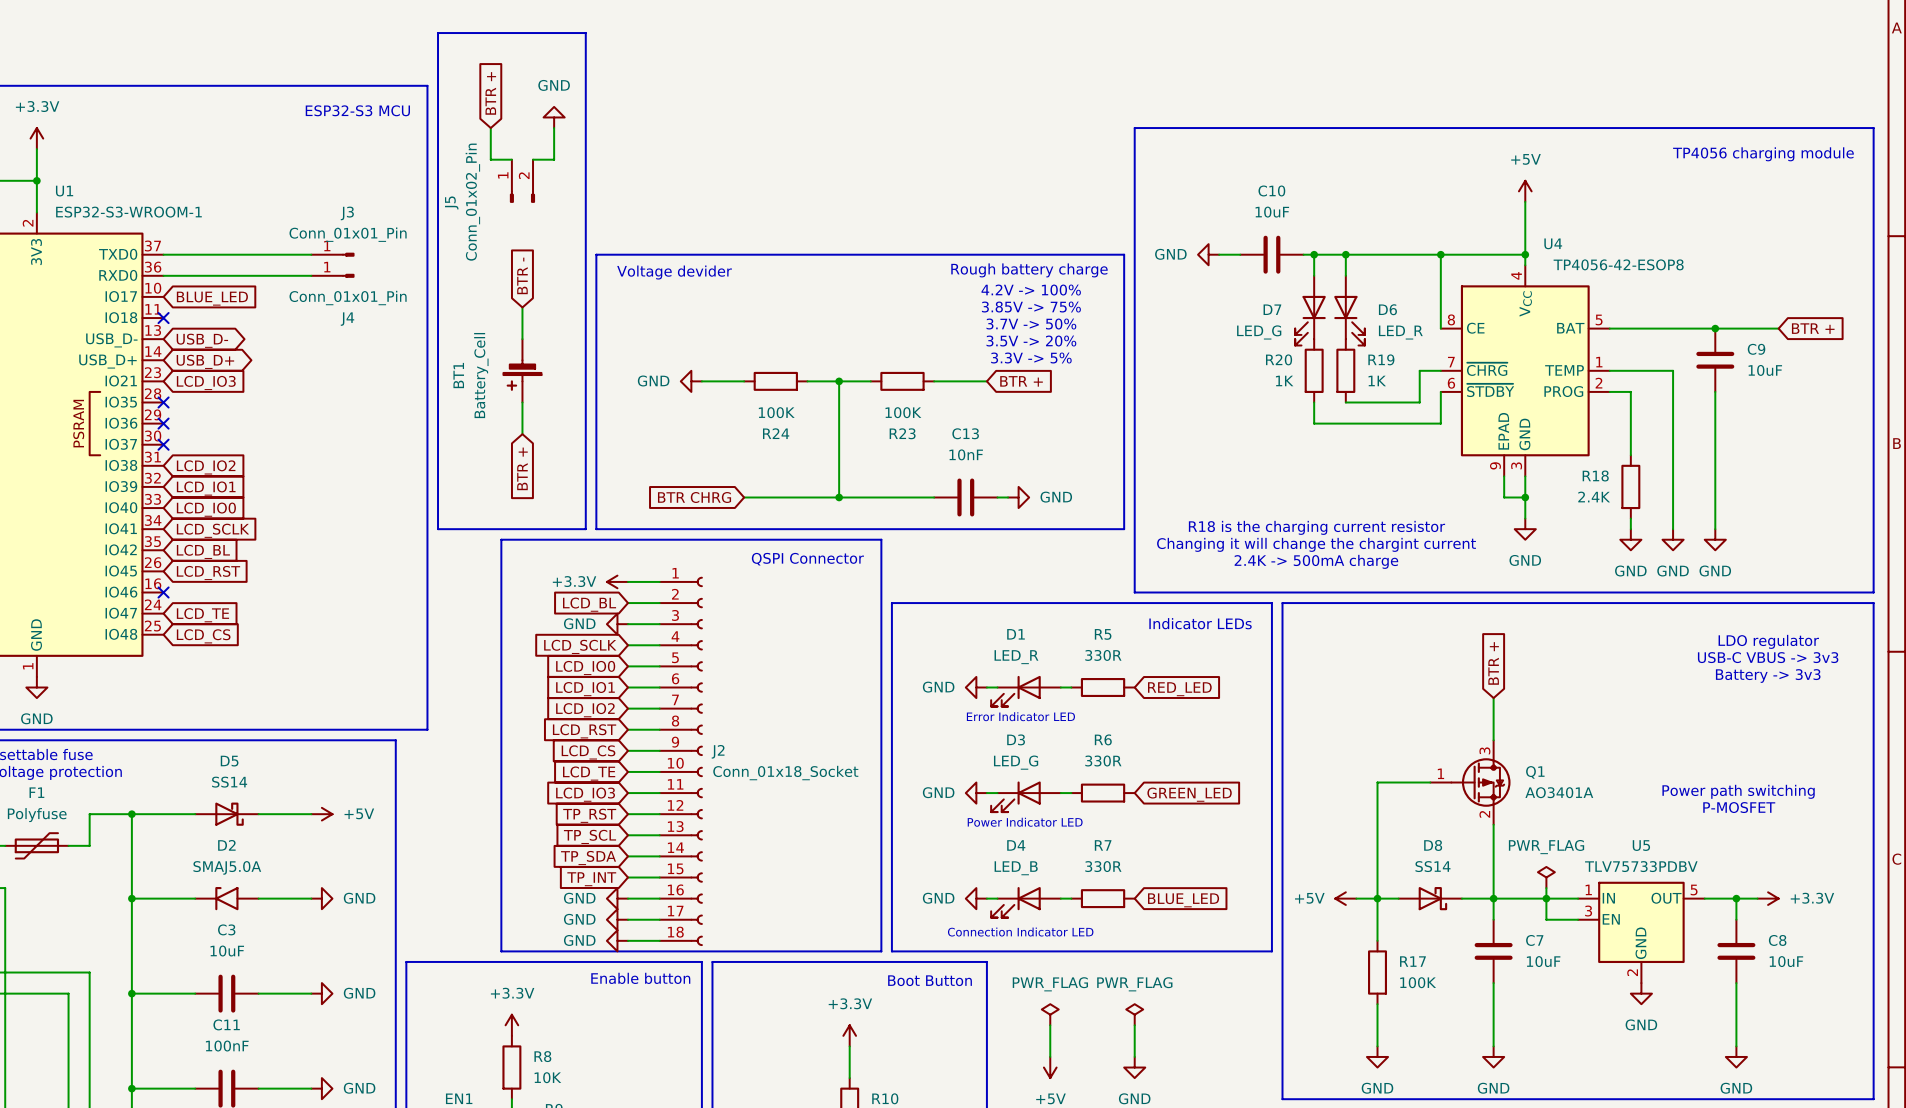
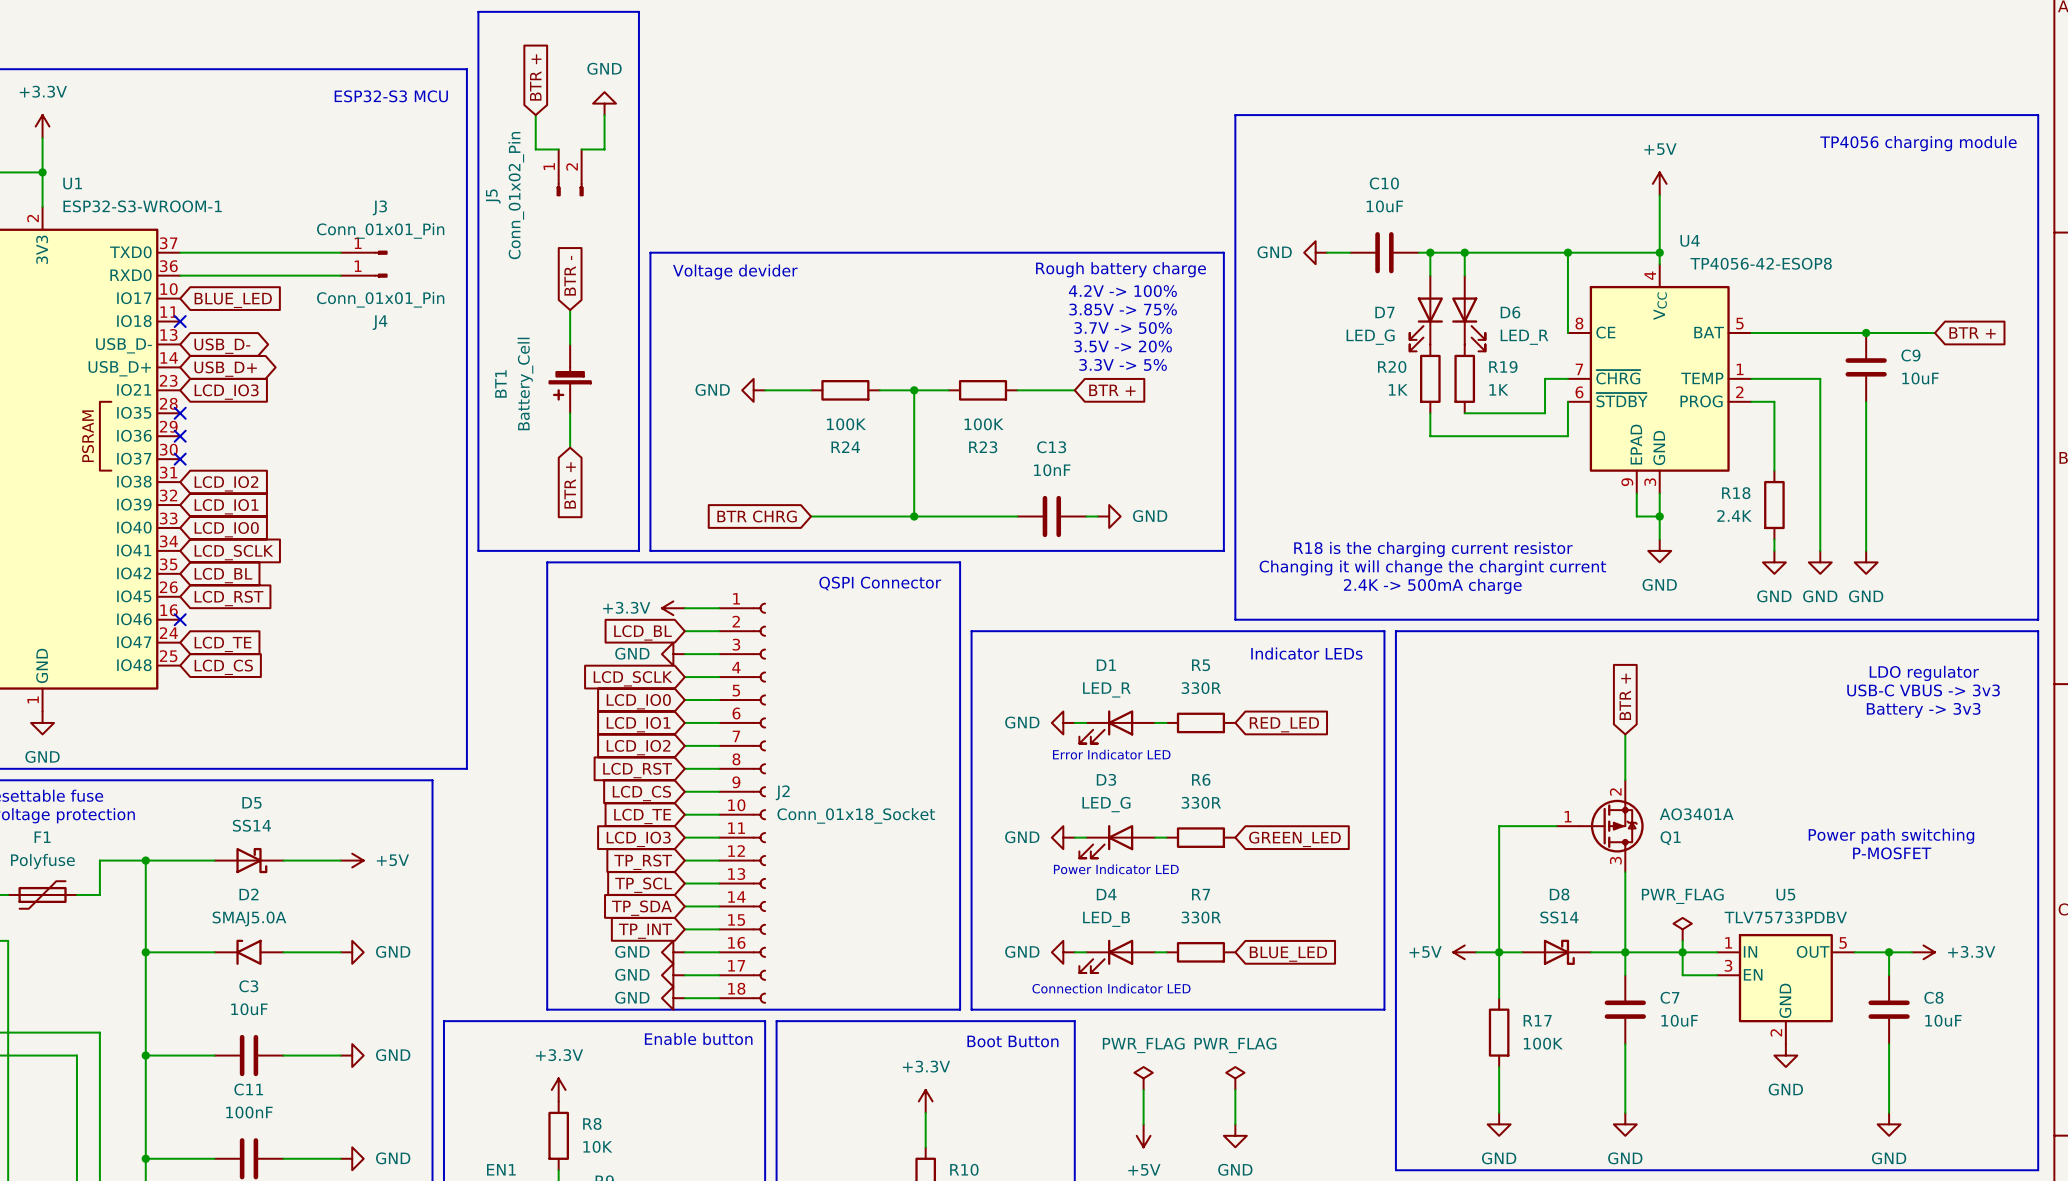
Q1 flip: as is (1480, 782) -> up-down (1611, 826)

